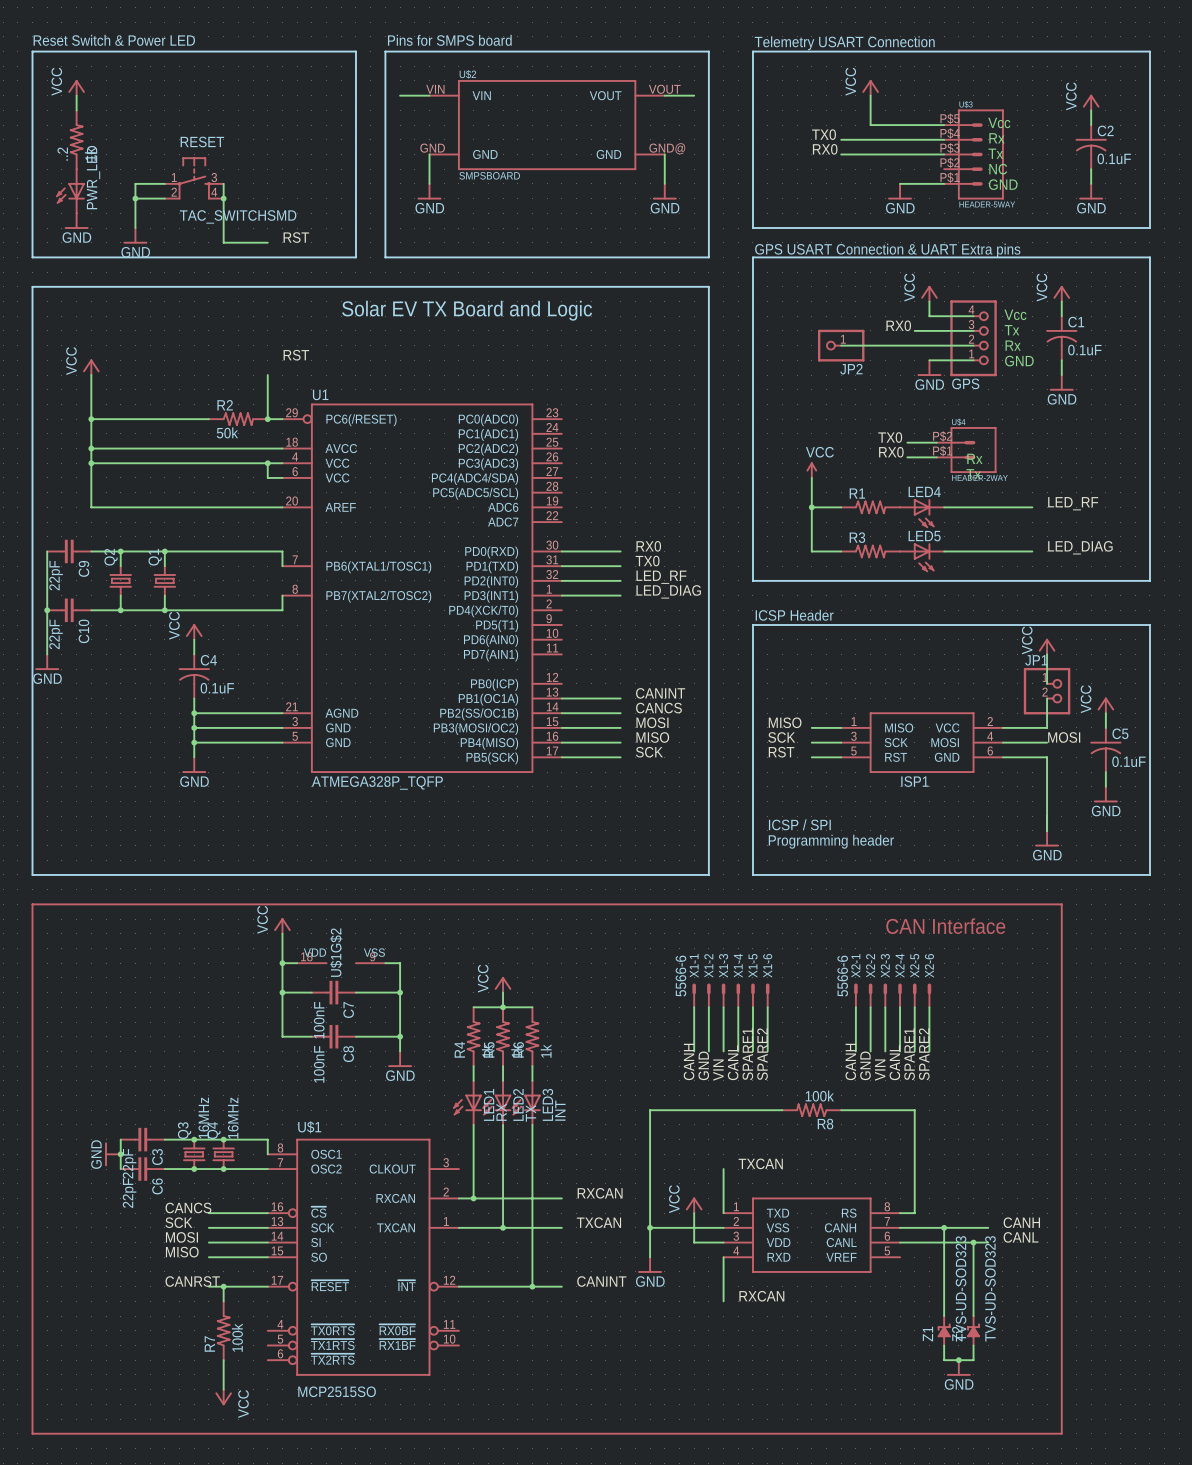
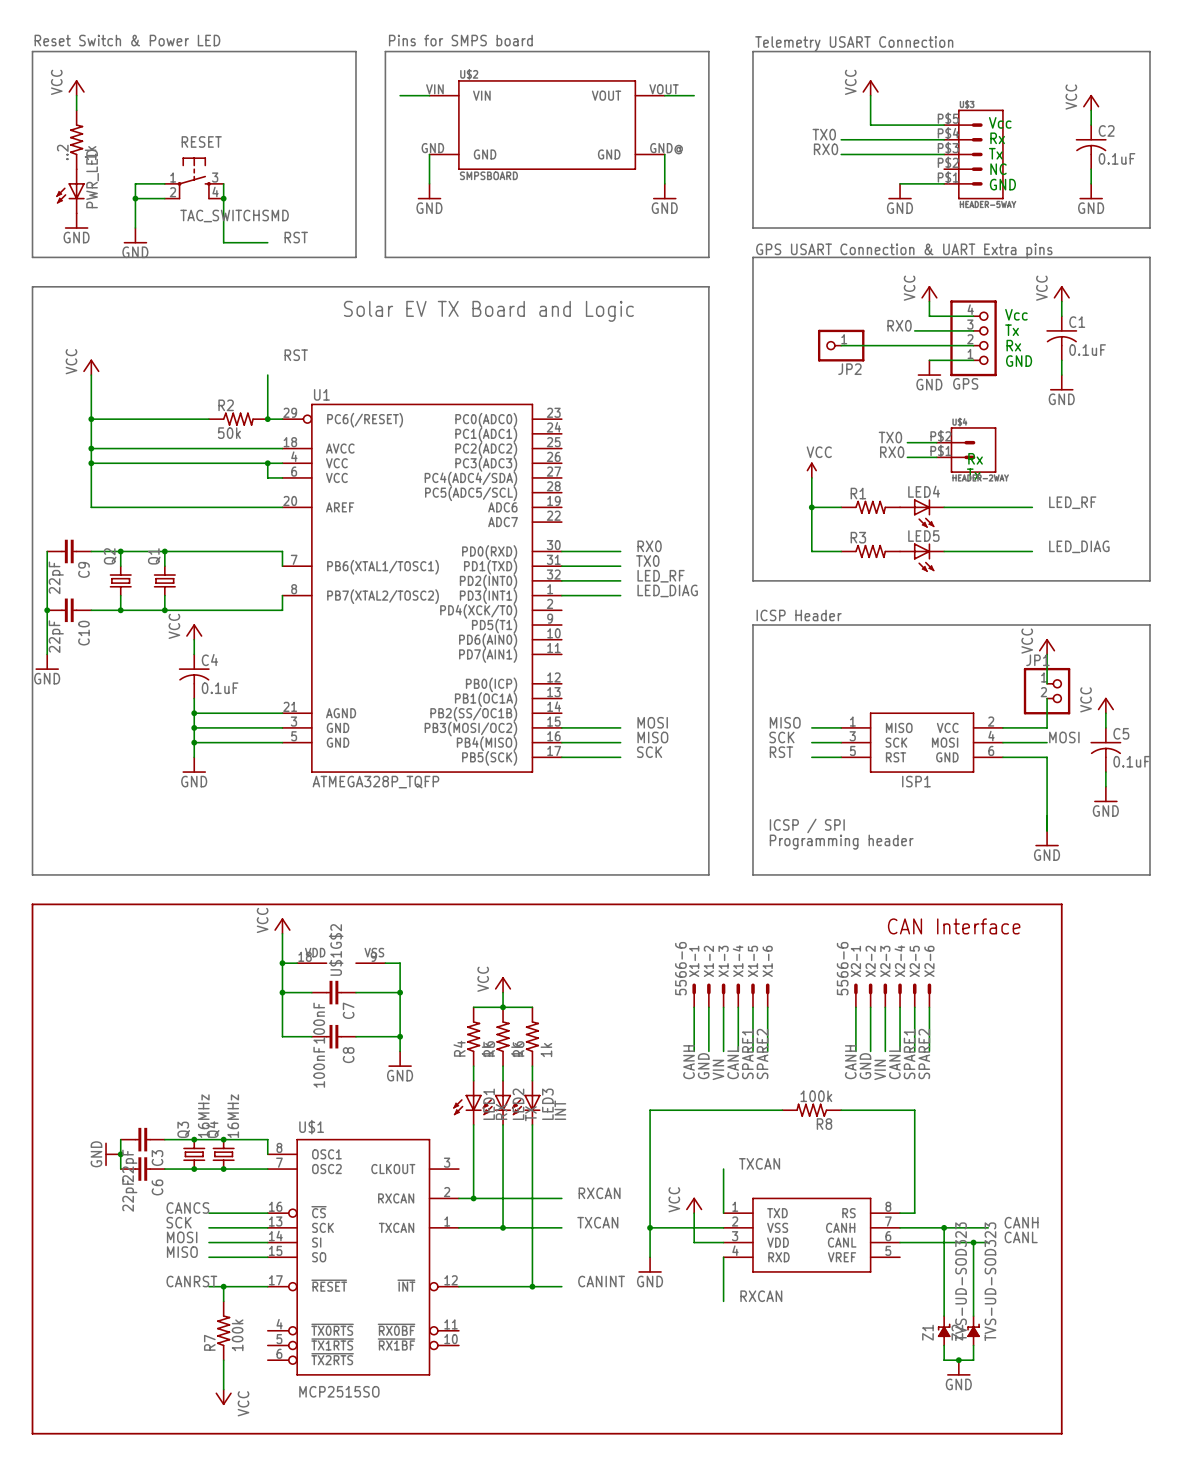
label: CANINT (660, 693) -> none
wire: (561, 698) (620, 698) -> none
label: CANCS (658, 708) -> none
wire: (561, 713) (620, 713) -> none

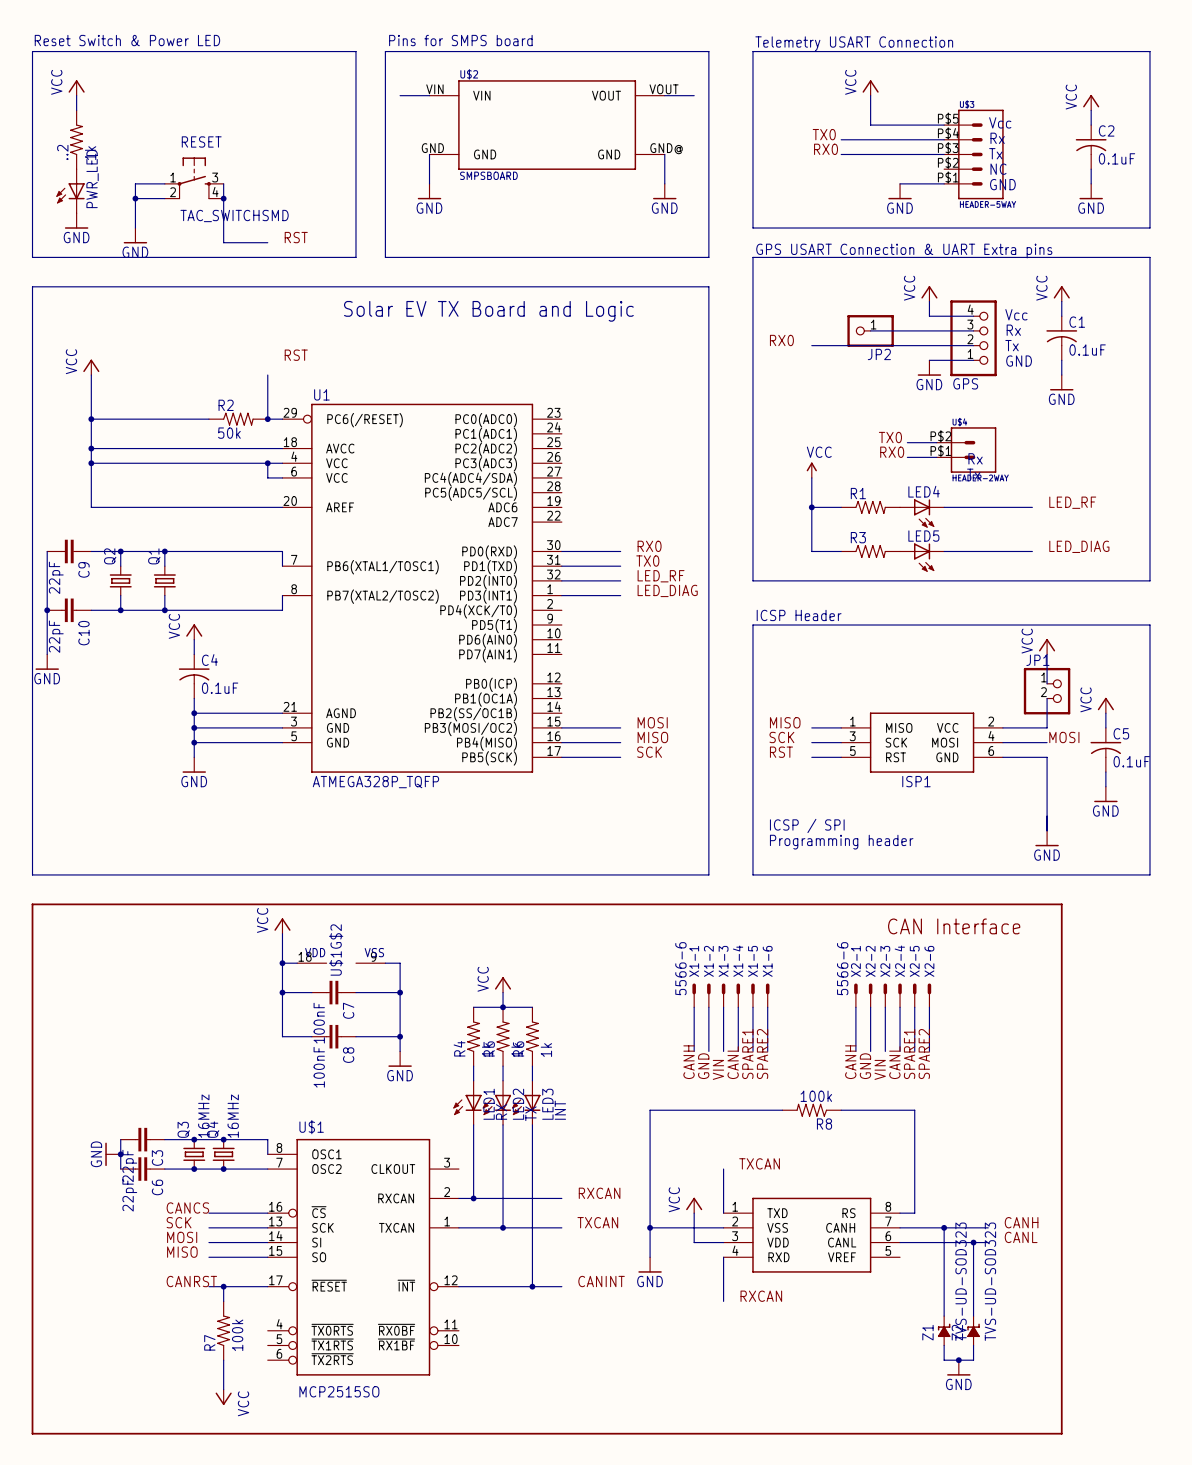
label position: RX0 (899, 325) -> RX0 (781, 340)
wire: none -> (870, 330) (914, 330)
text: Tx (1012, 330) -> Rx (1013, 330)
wire: none -> (811, 345) (841, 345)
JP2 position: (841, 345) -> (870, 330)
text: Rx (1013, 345) -> Tx (1012, 345)

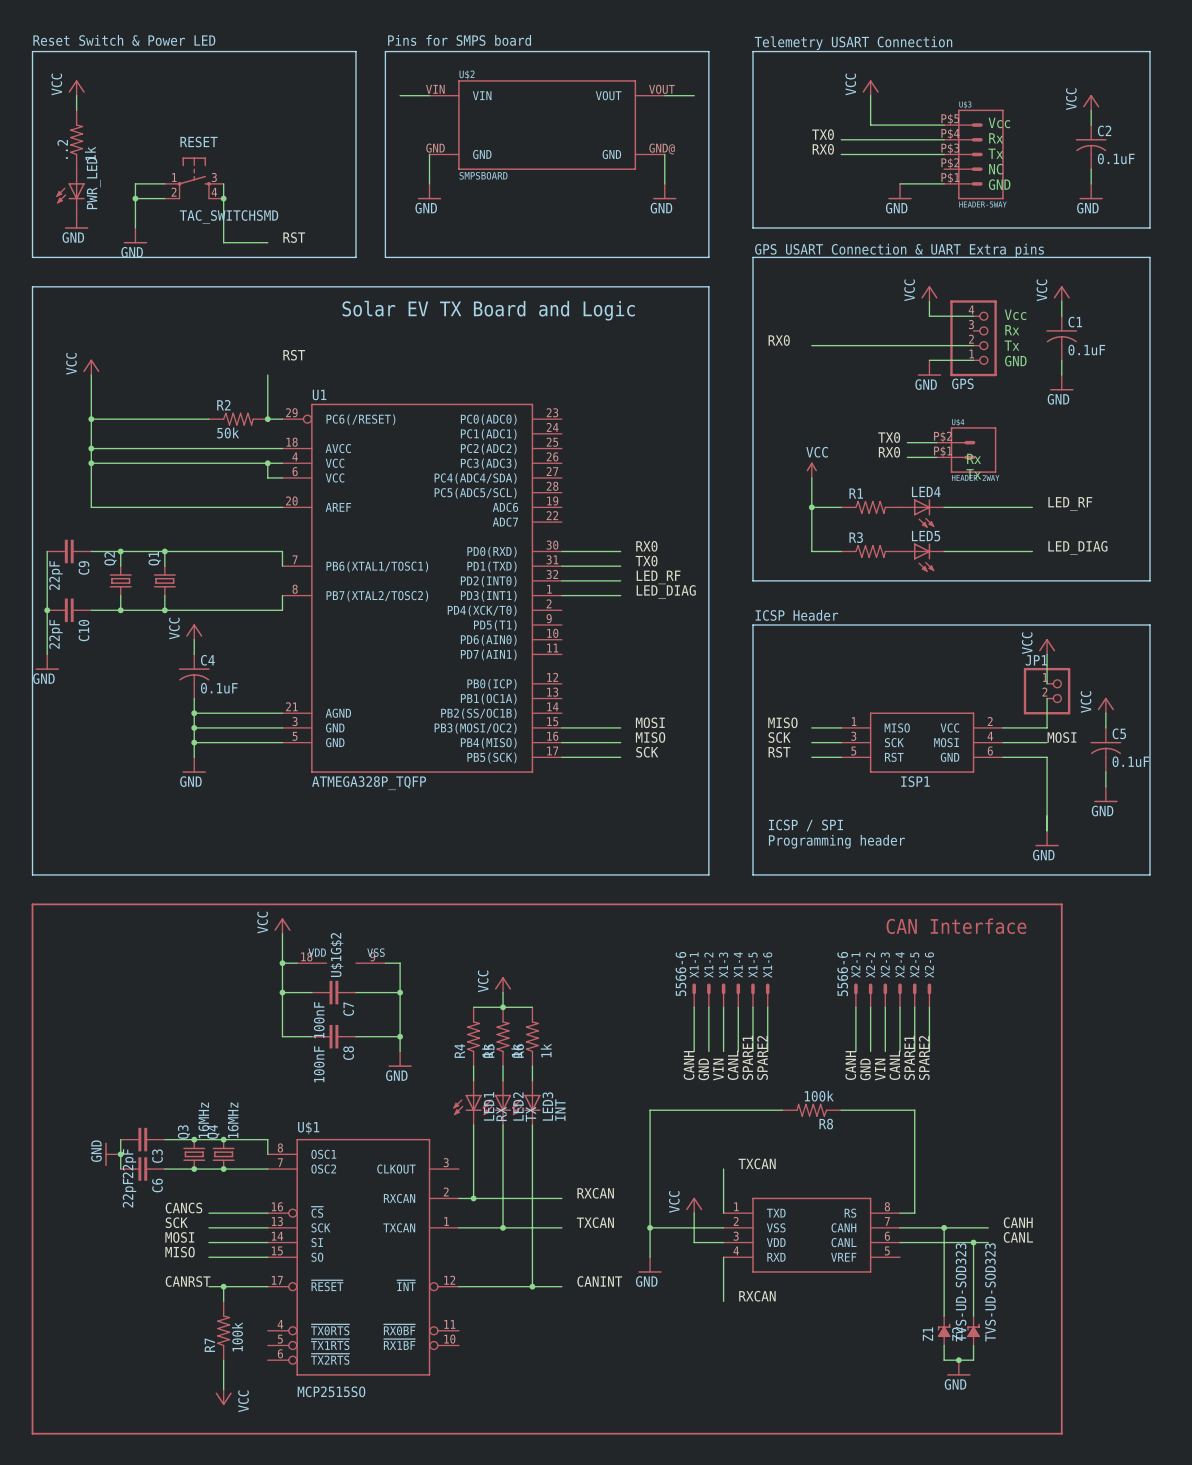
wire: (870, 330) (973, 330) -> none
JP2: (870, 330) -> none

